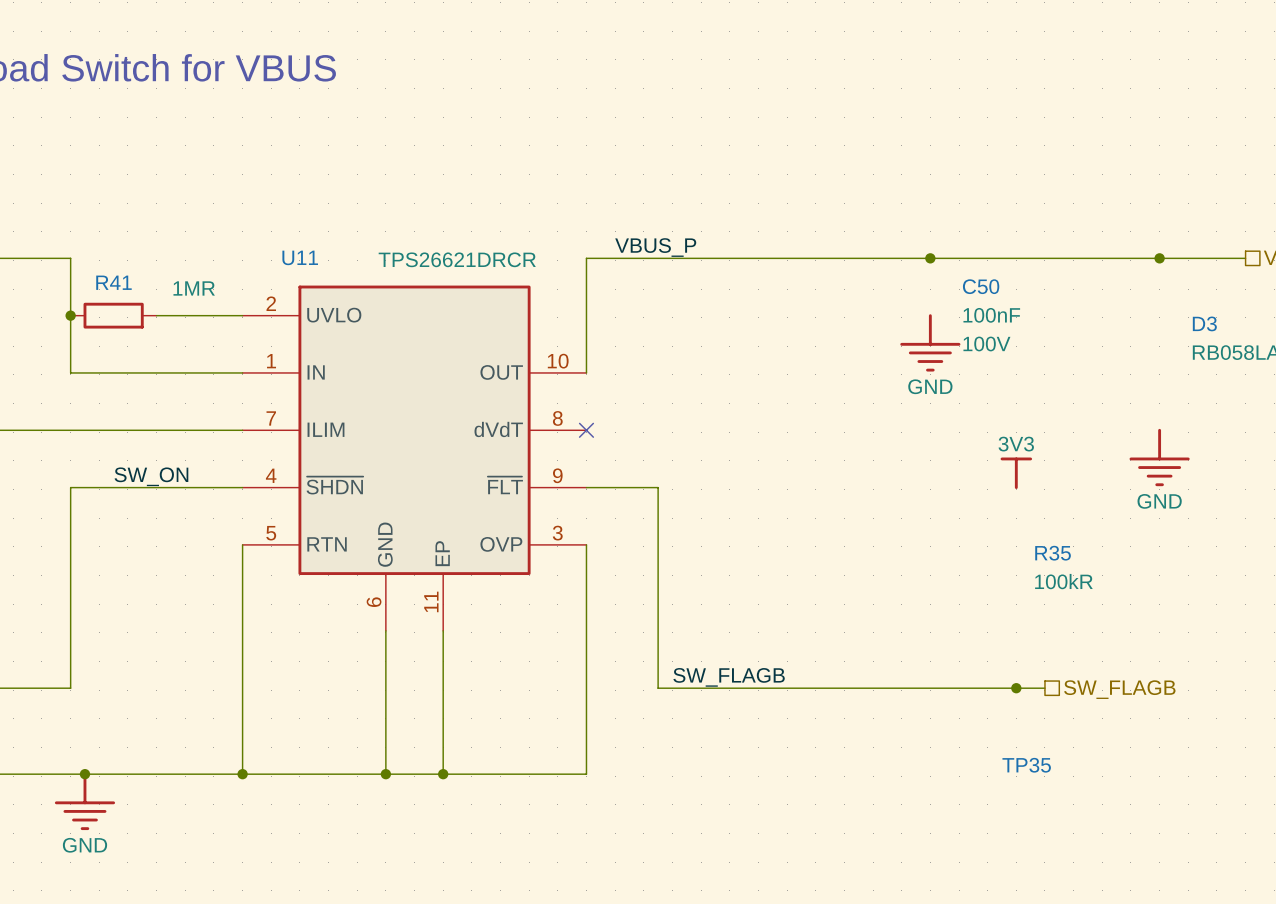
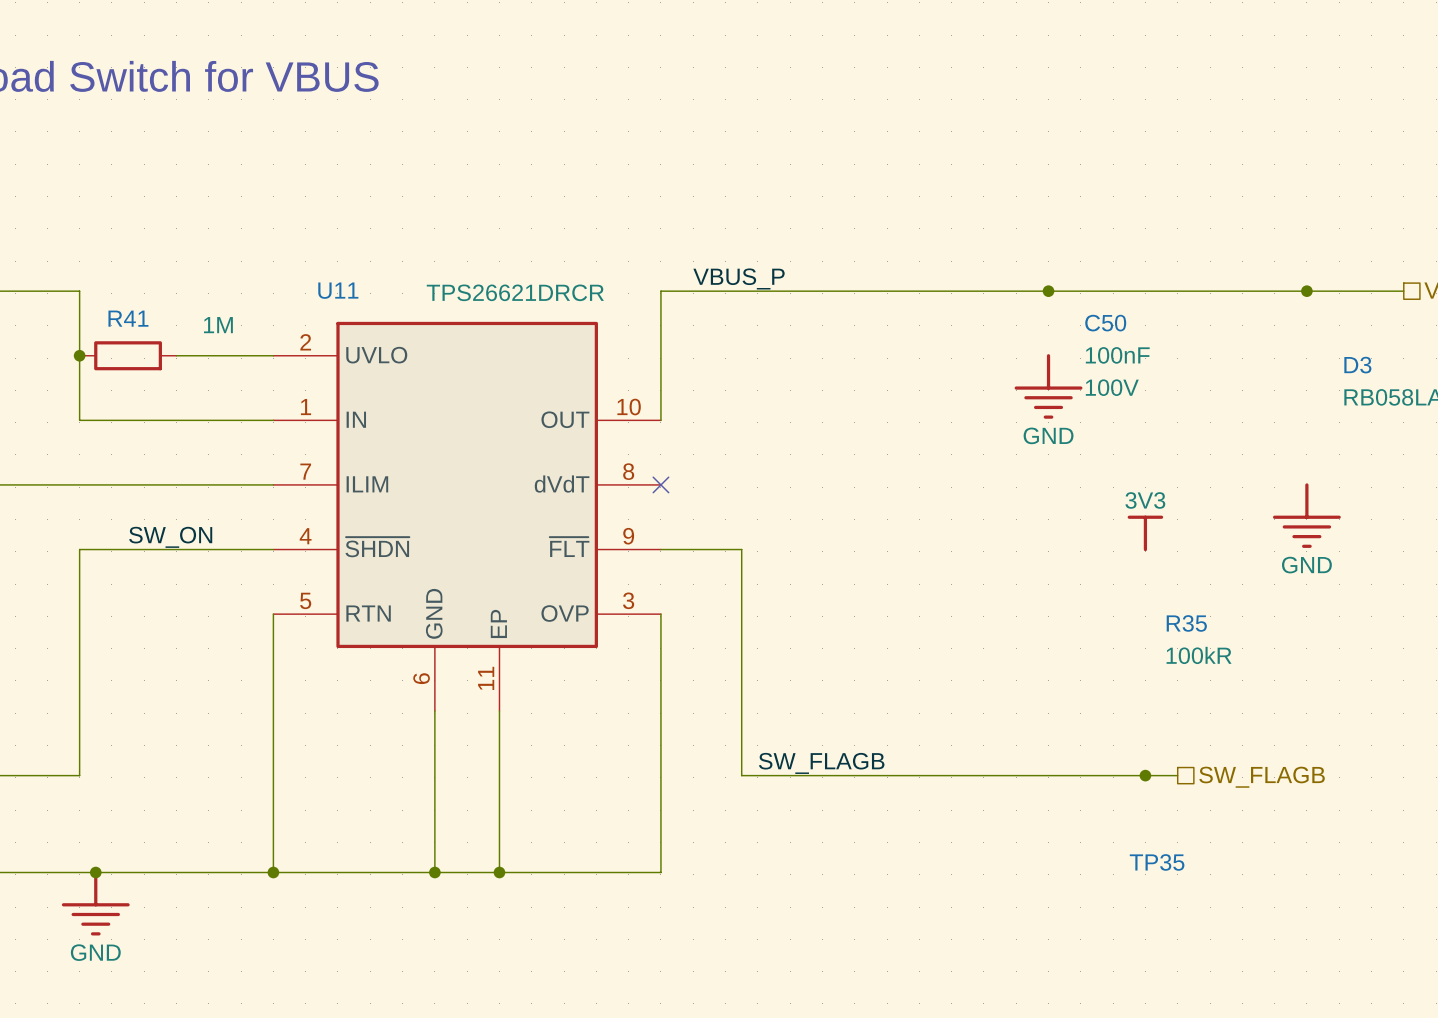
R41 value: none -> 1M (218, 325)
R41 text: 1MR (194, 288) -> none

